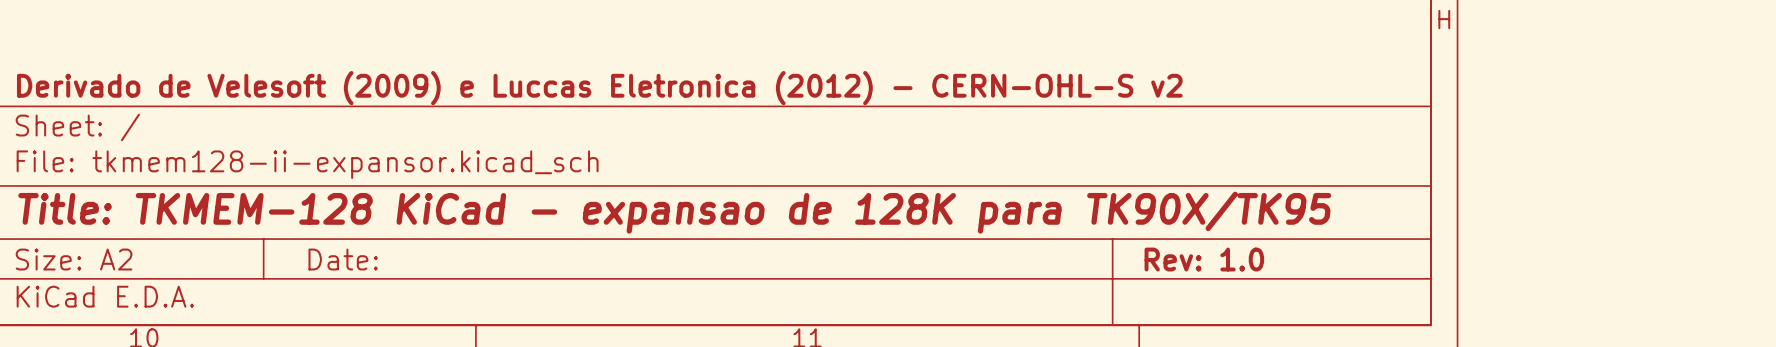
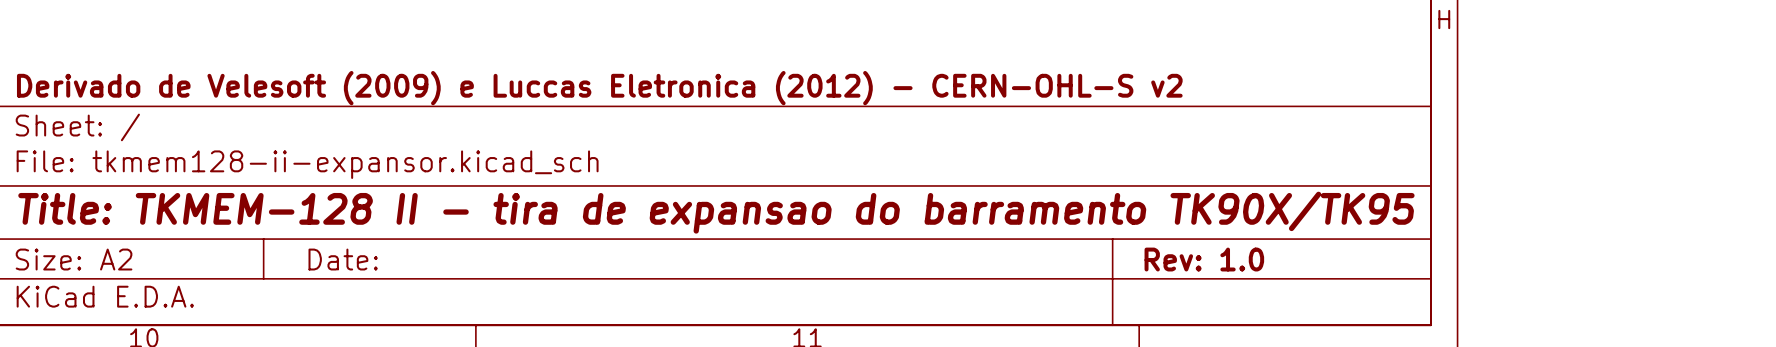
title block: Title: TKMEM-128 KiCad - expansao de 128K para TK90X/TK95 (674, 212) -> Title: TKMEM-128 II - tira de expansao do barramento TK90X/TK95 (716, 212)

